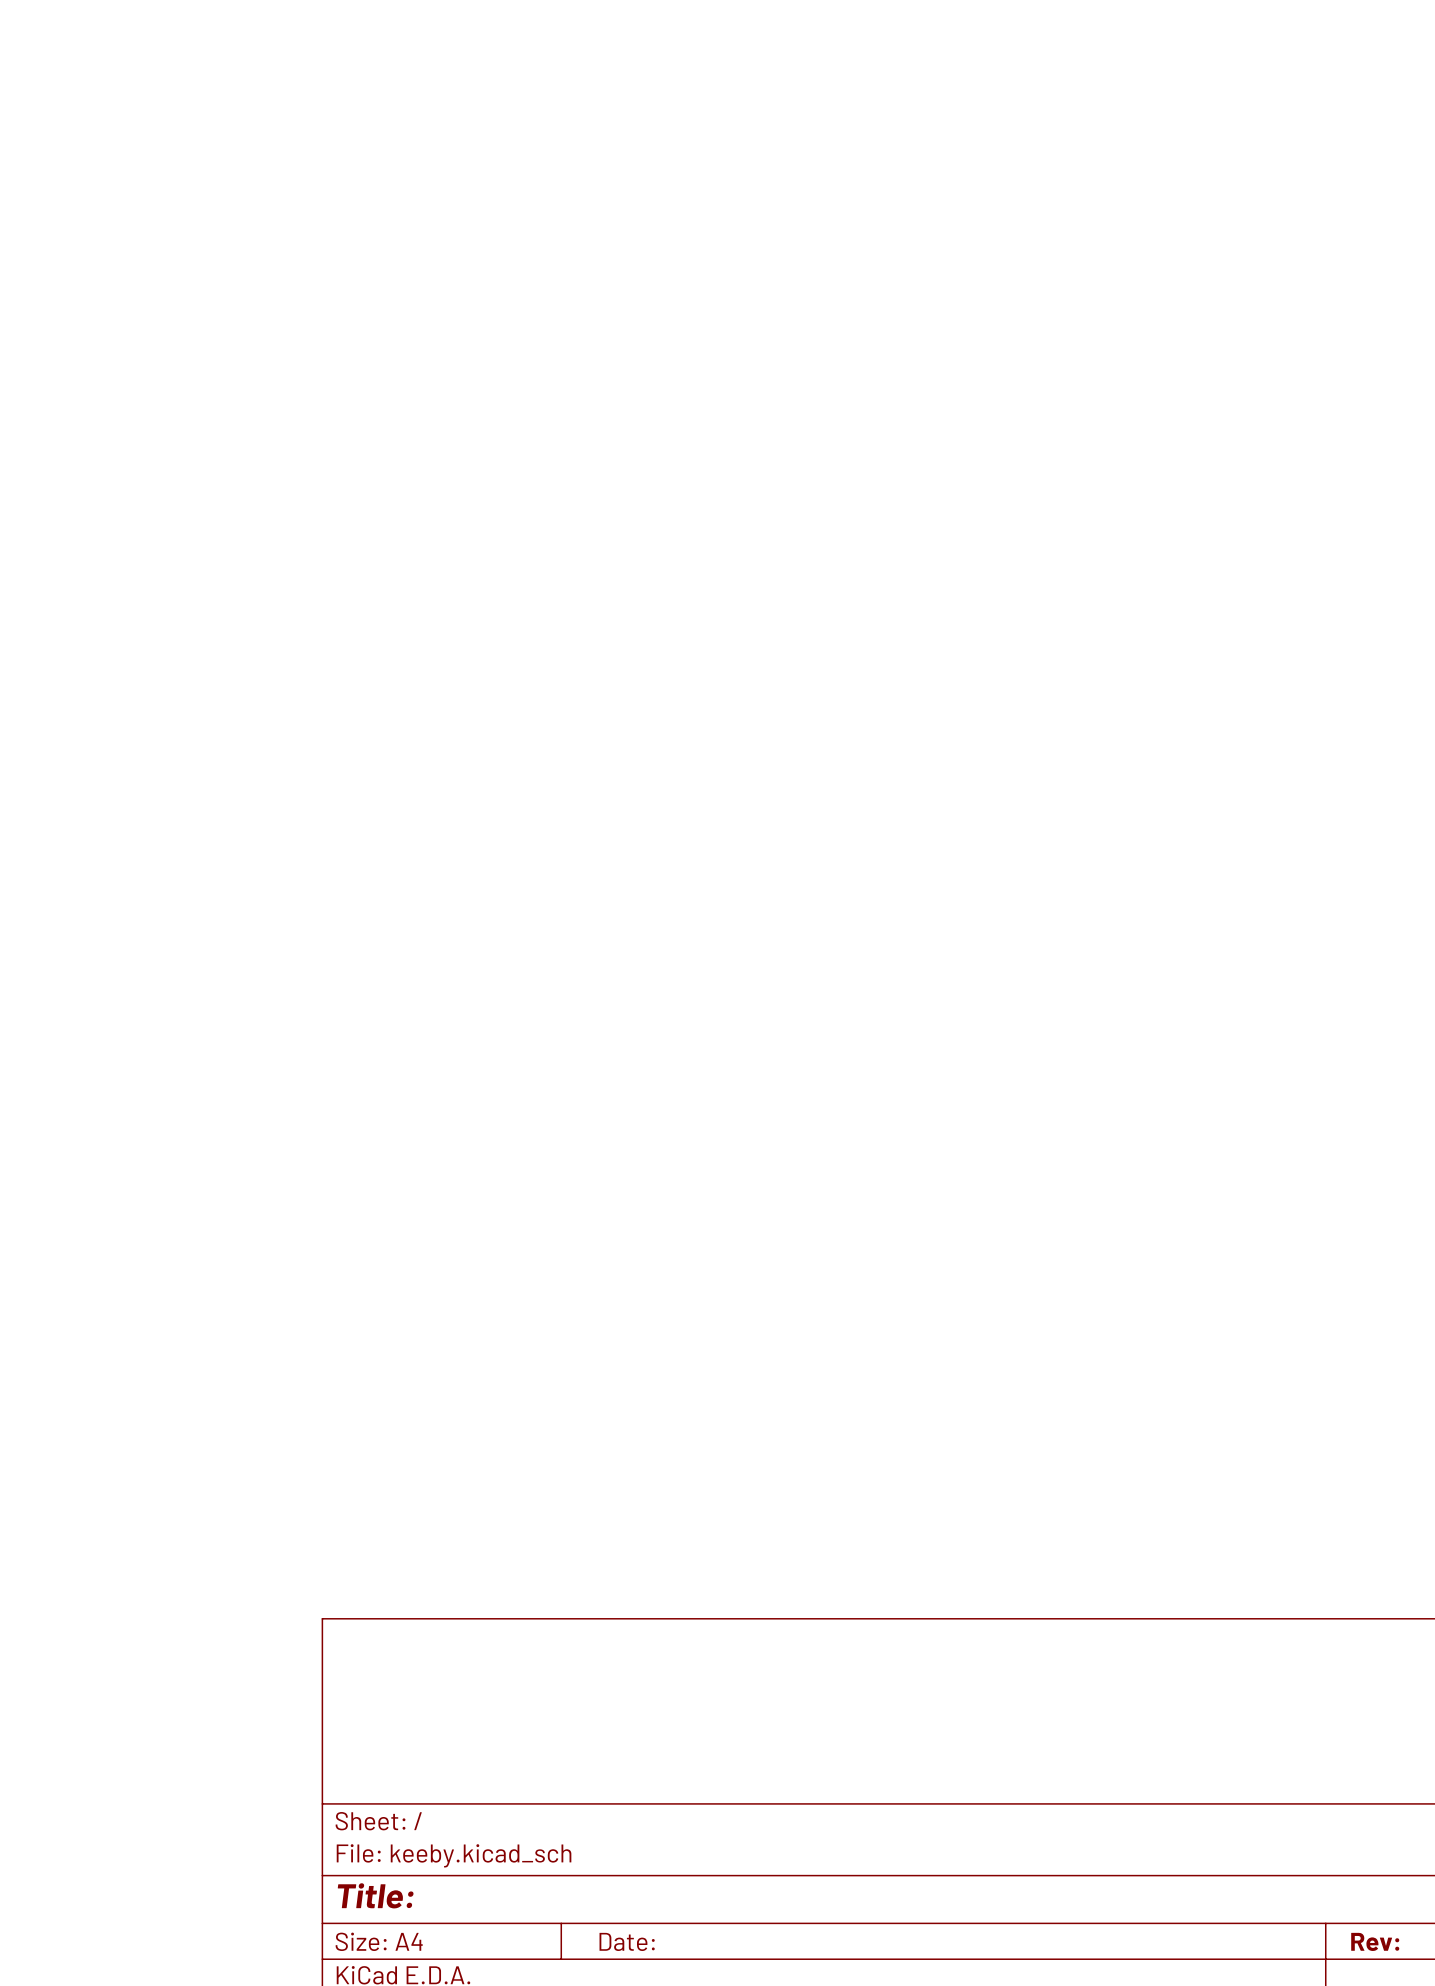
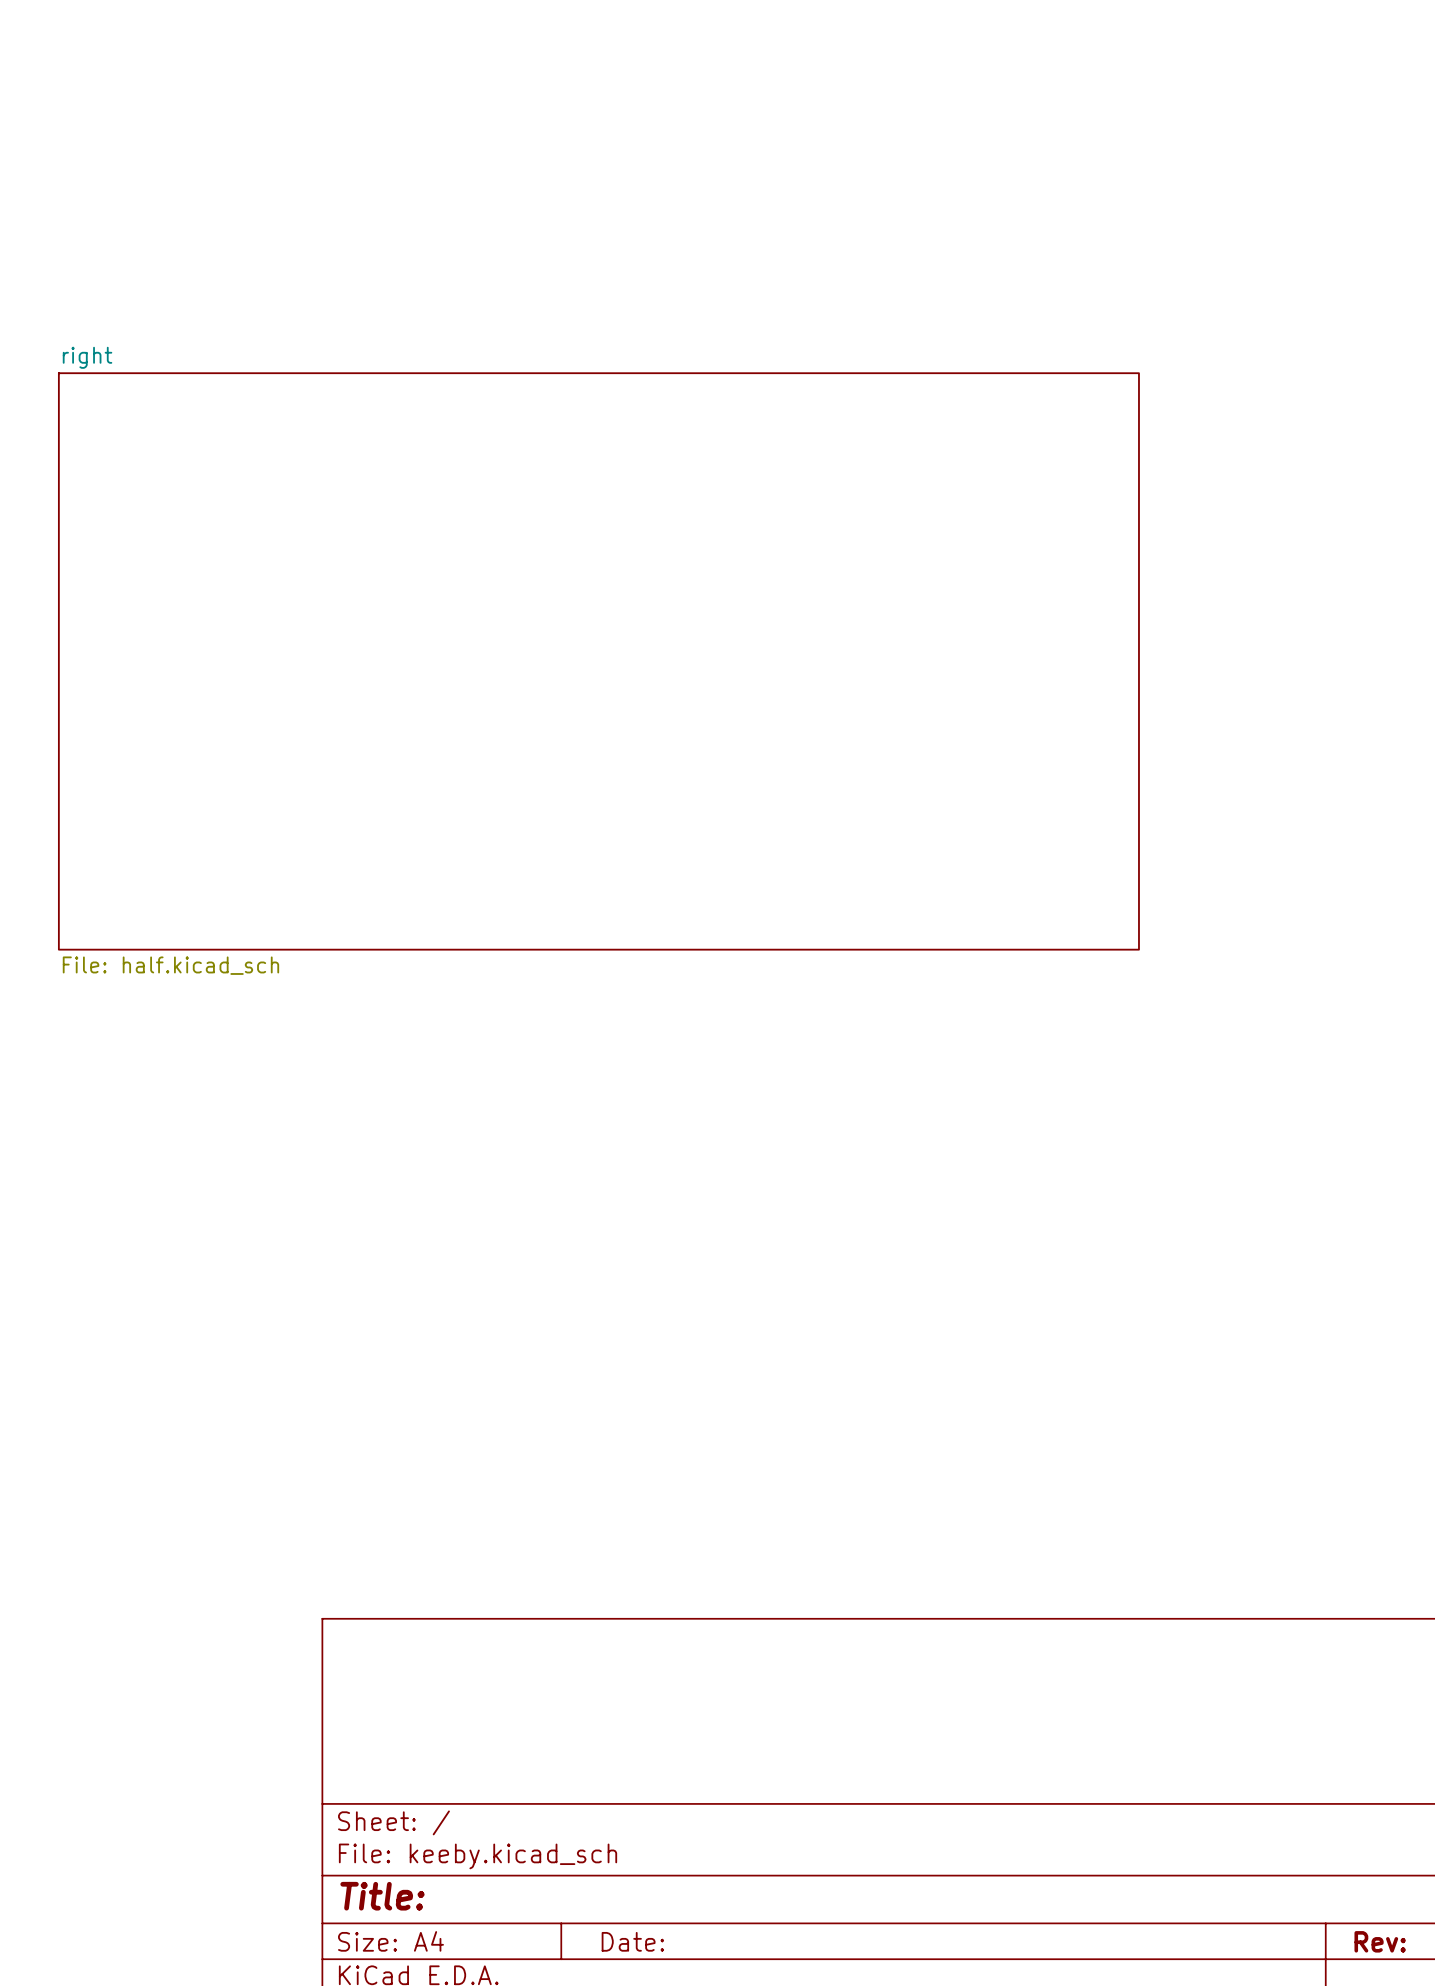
sheet right: none -> File: half.kicad_sch (598, 661)

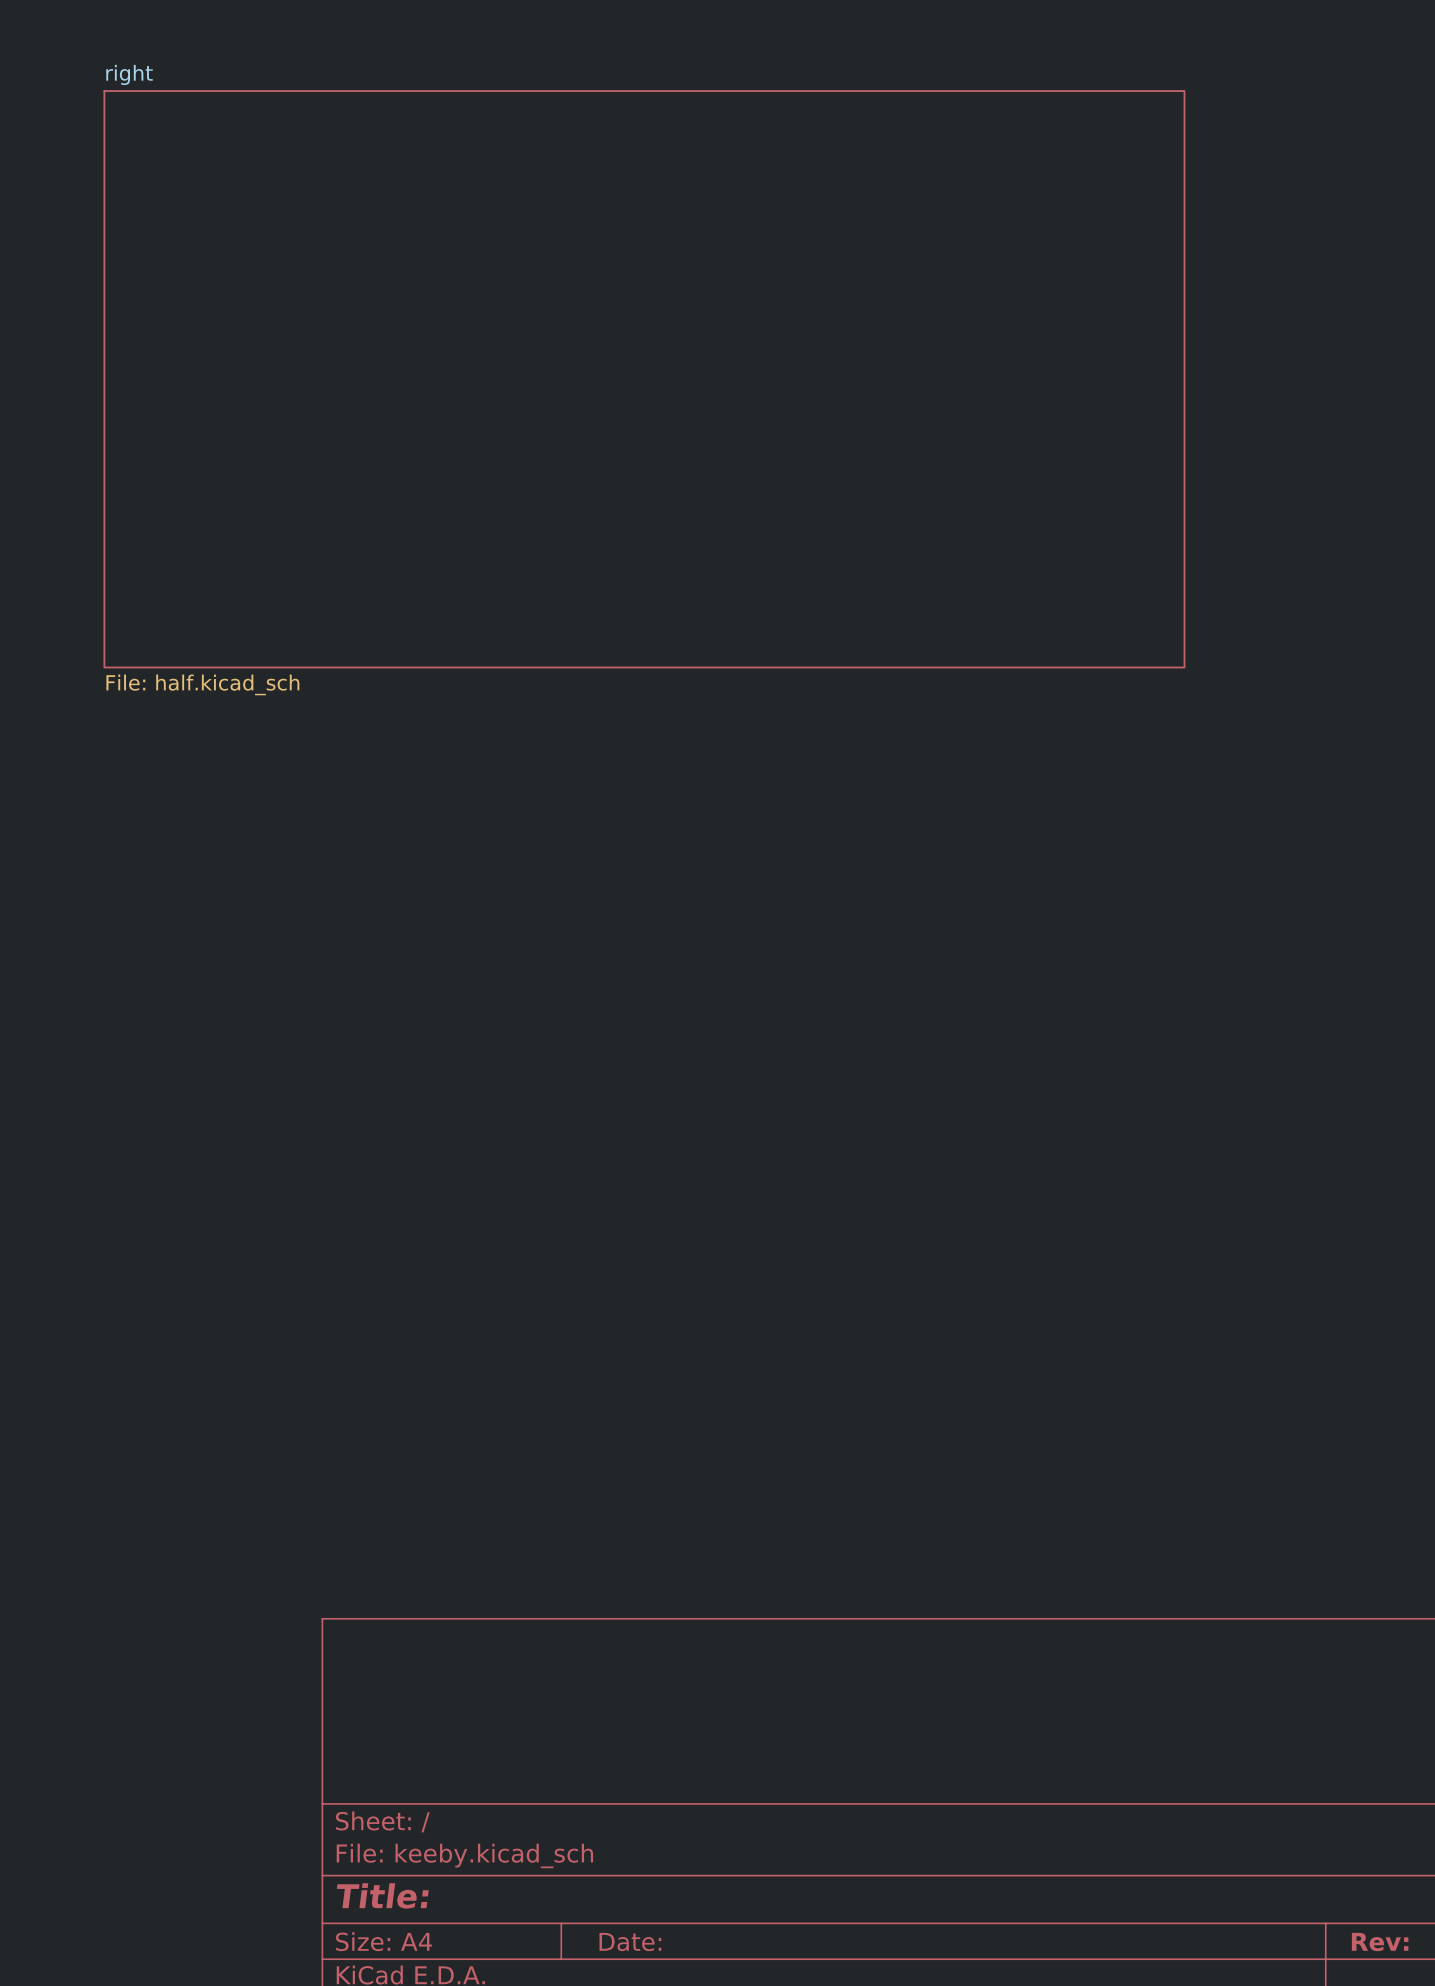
sheet right position: (598, 661) -> (644, 379)

